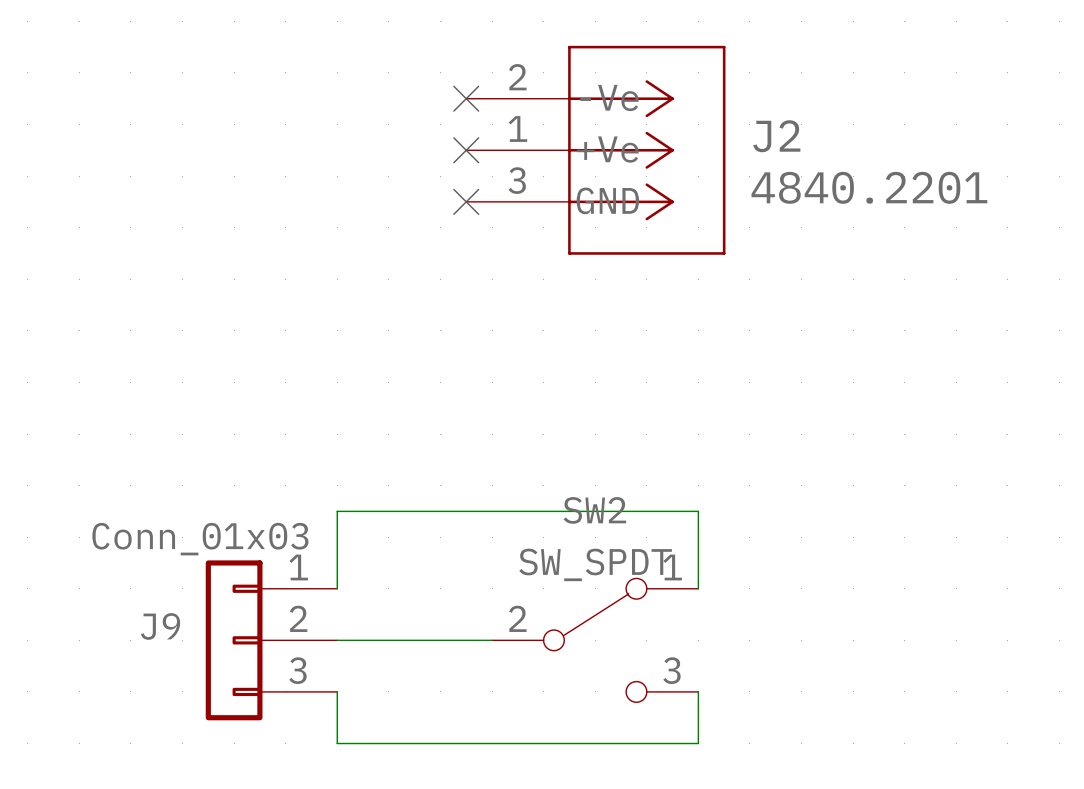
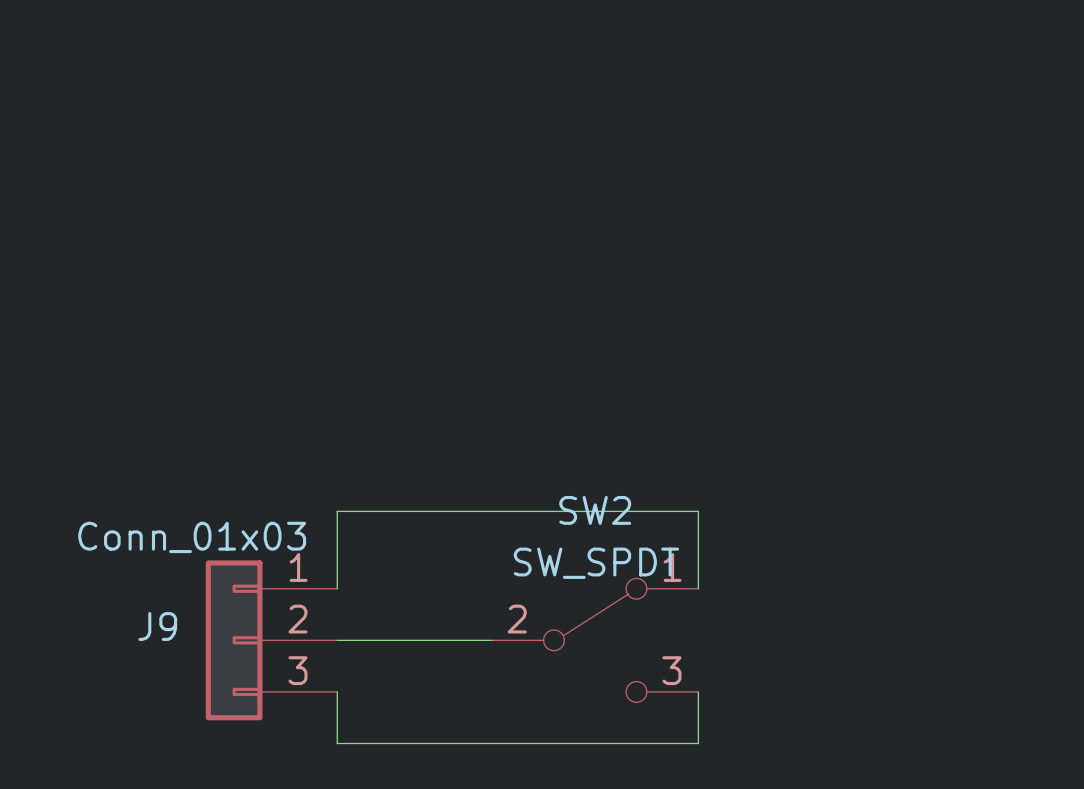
no-connect mark: (466, 98) -> none
no-connect mark: (466, 150) -> none
J2: 4840.2201 (595, 150) -> none
no-connect mark: (466, 201) -> none

